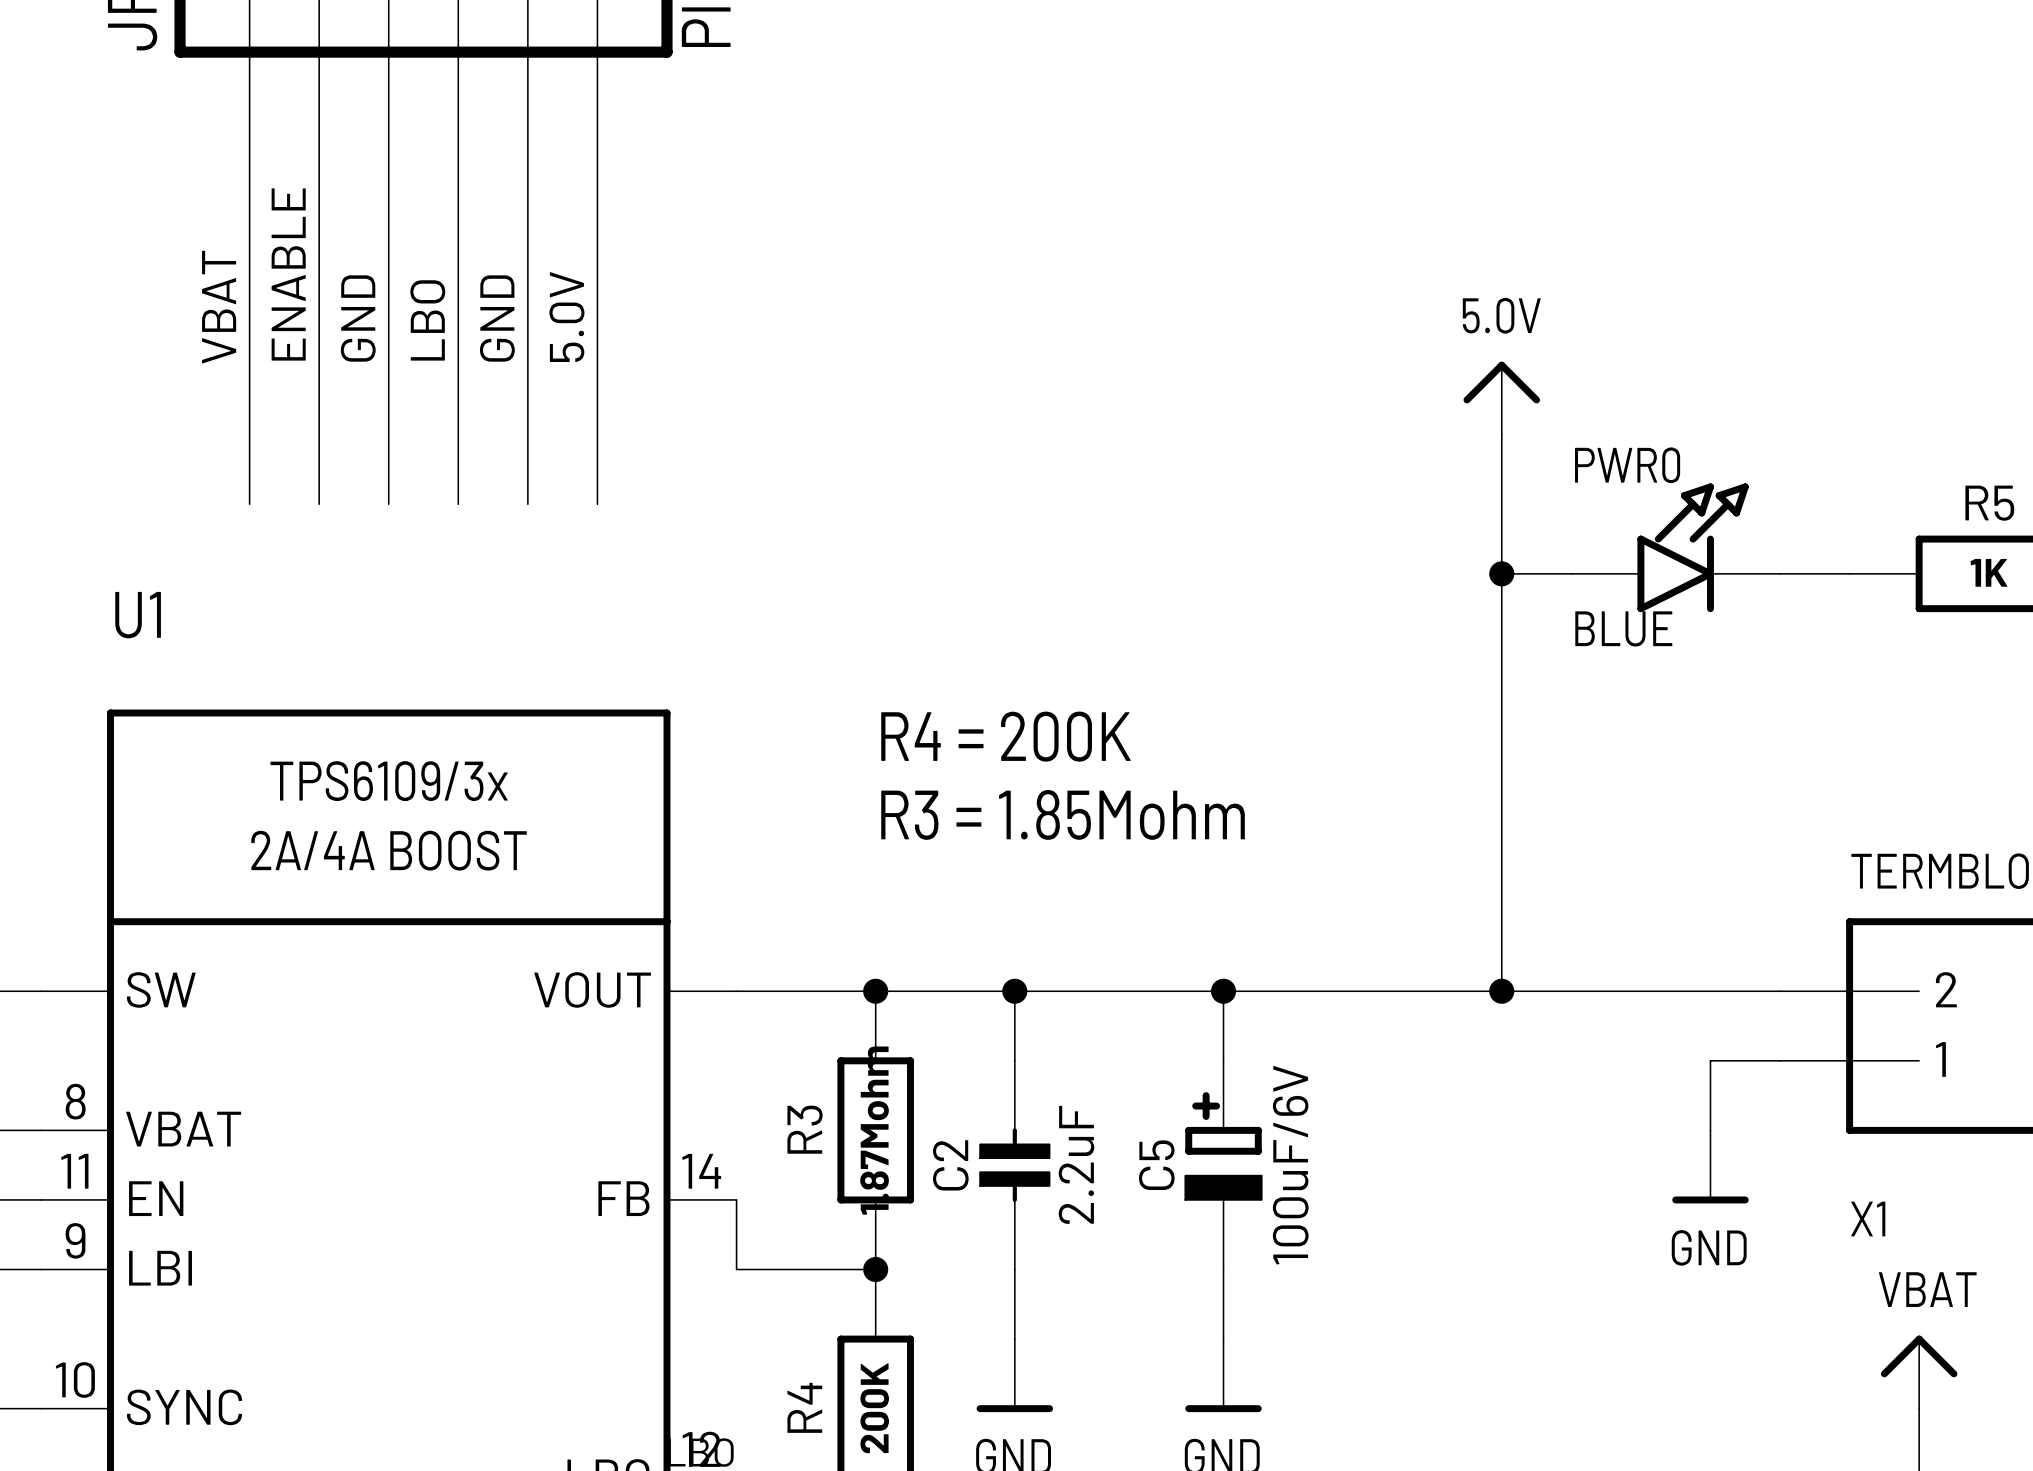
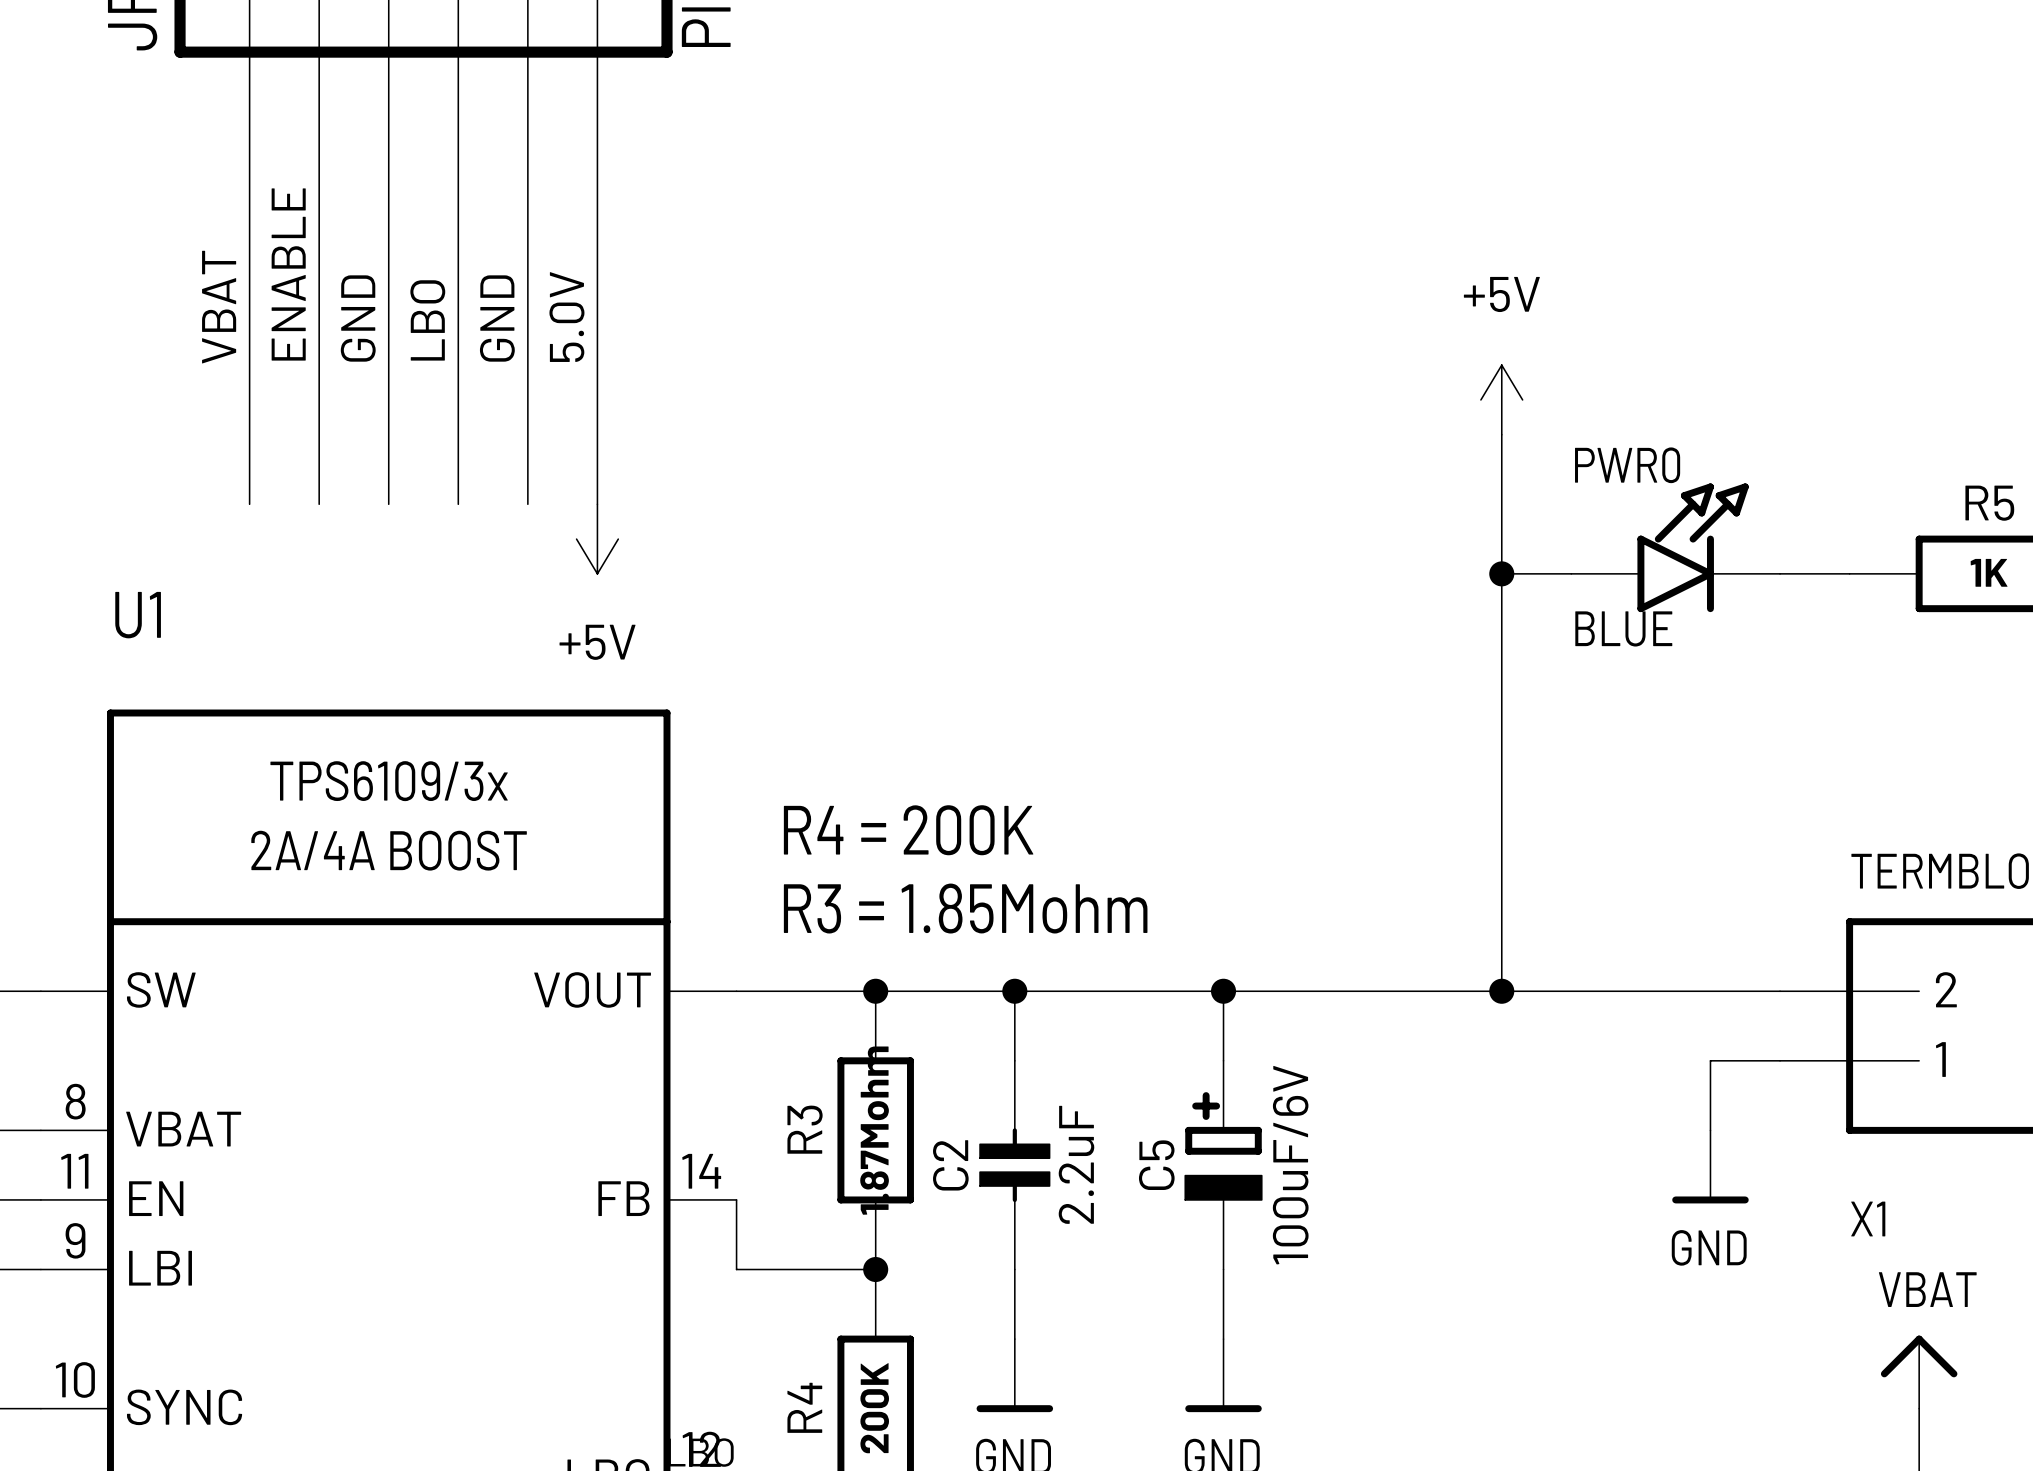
power symbol: 5.0V (1501, 398) -> +5V (1501, 399)
power symbol: none -> +5V (597, 539)
text position: R4 = 200K (1005, 736) -> R4 = 200K (908, 830)
text position: R3 = 1.85Mohm (1063, 814) -> R3 = 1.85Mohm (965, 908)

